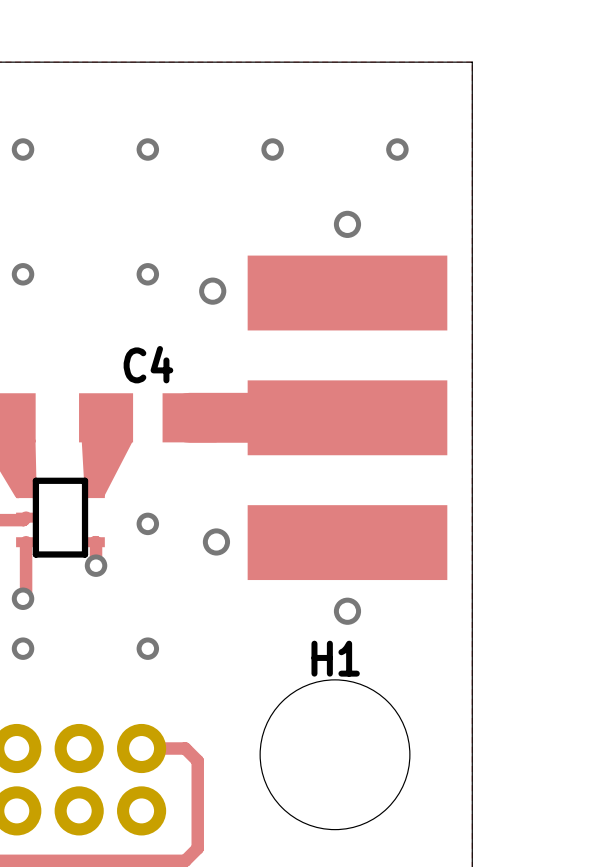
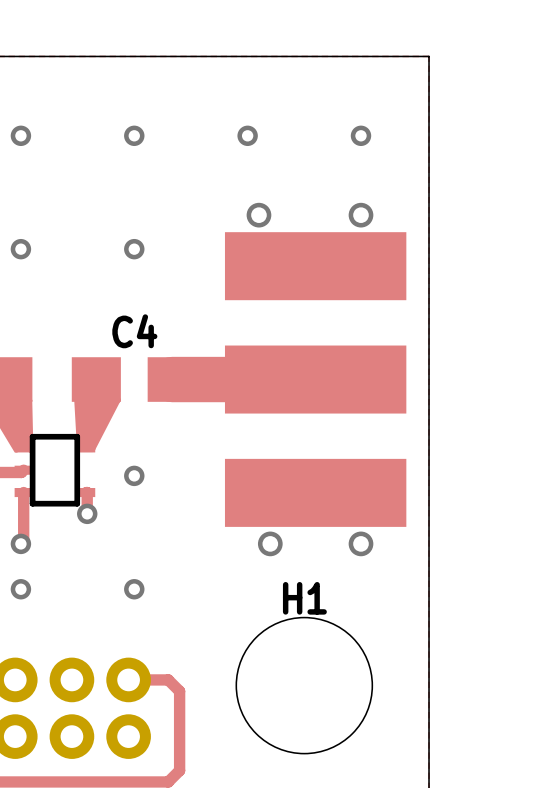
via: (347, 224) -> none
via: none -> (258, 215)
via: none -> (360, 215)
via: (212, 291) -> none
via: (216, 541) -> none
via: none -> (270, 543)
via: none -> (360, 543)
via: (347, 611) -> none

